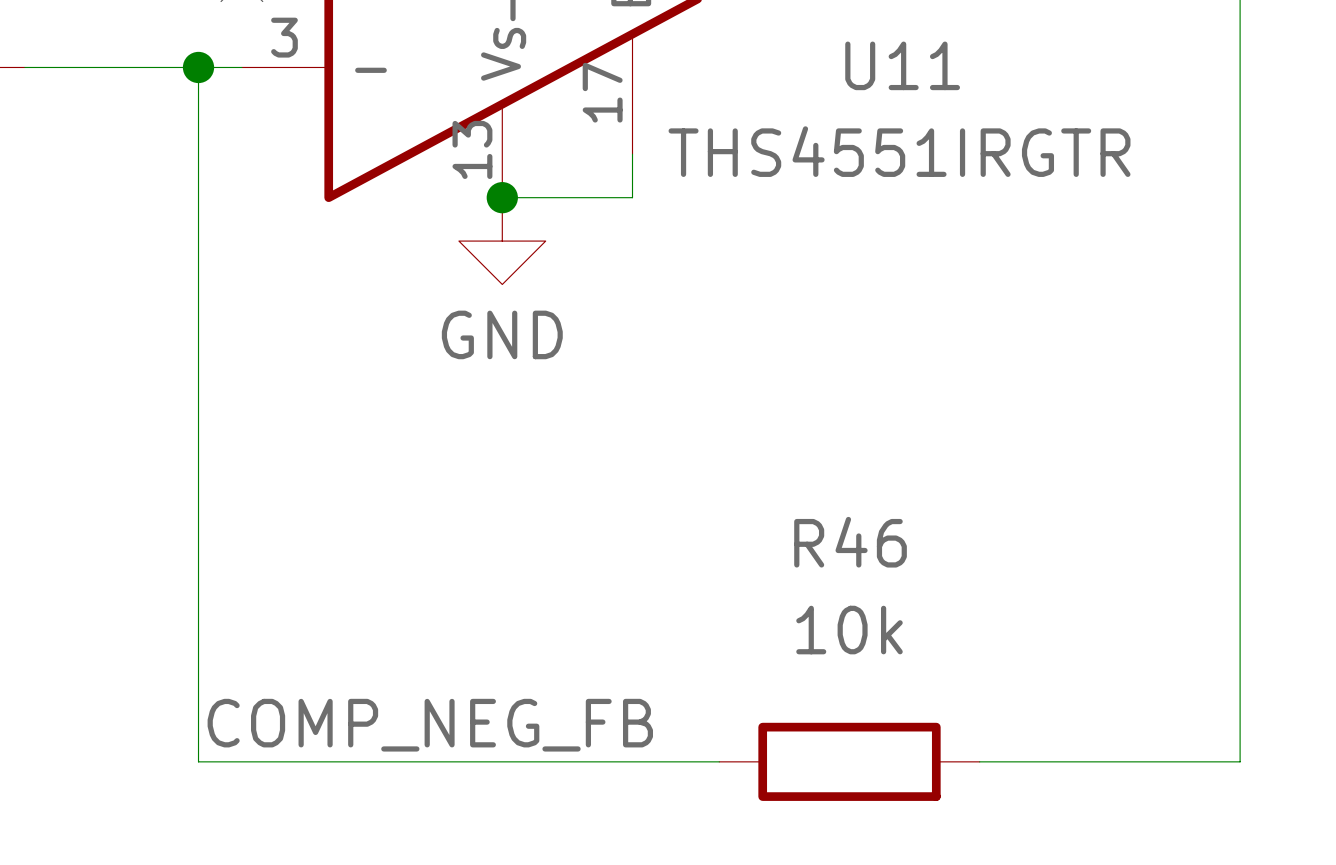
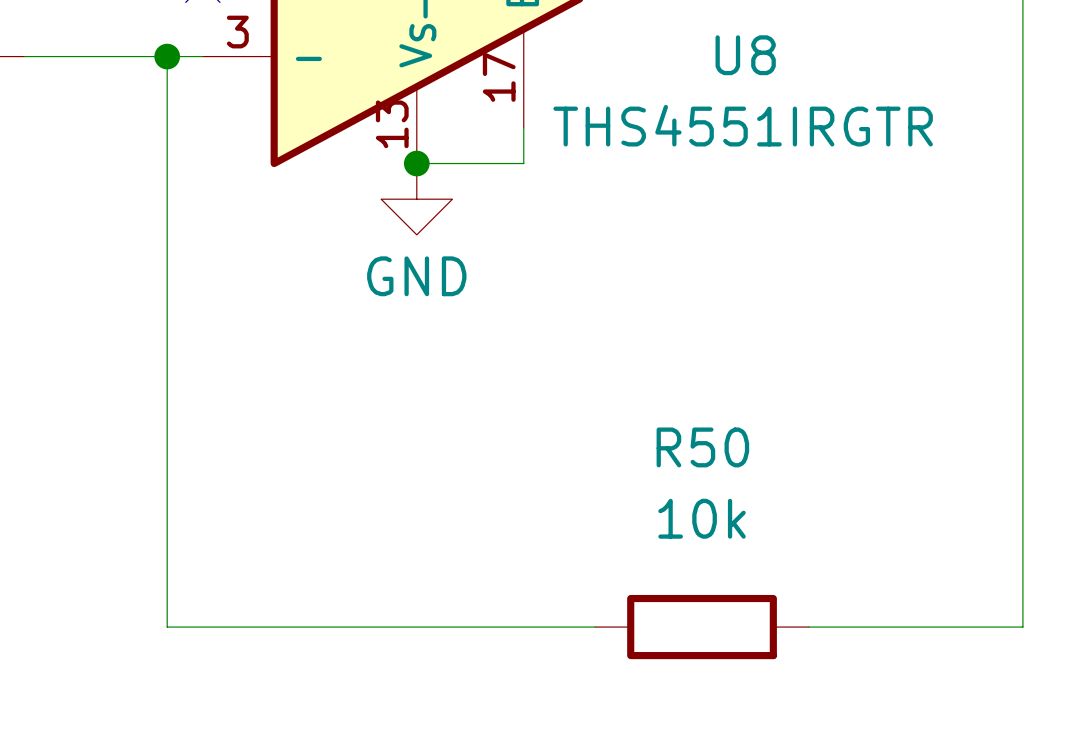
U11 name: U11 (902, 65) -> U8 (745, 55)
R46 name: R46 (850, 542) -> R50 (702, 447)
label: COMP_NEG_FB (430, 725) -> none

